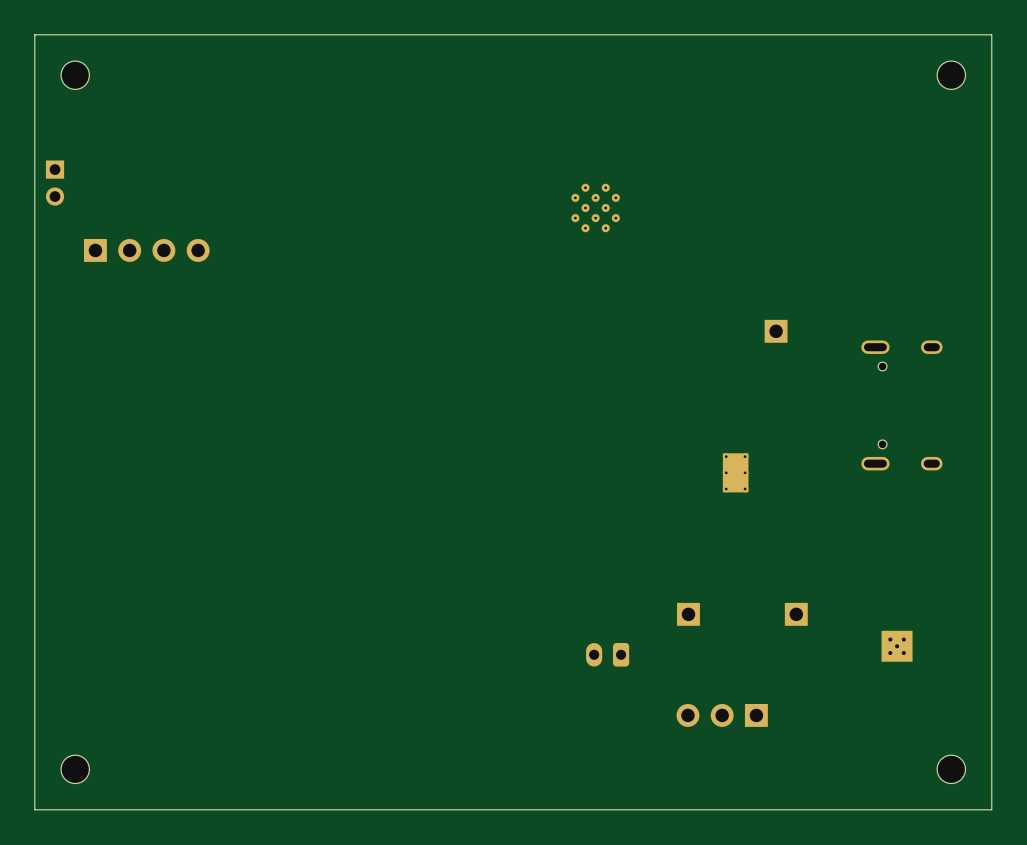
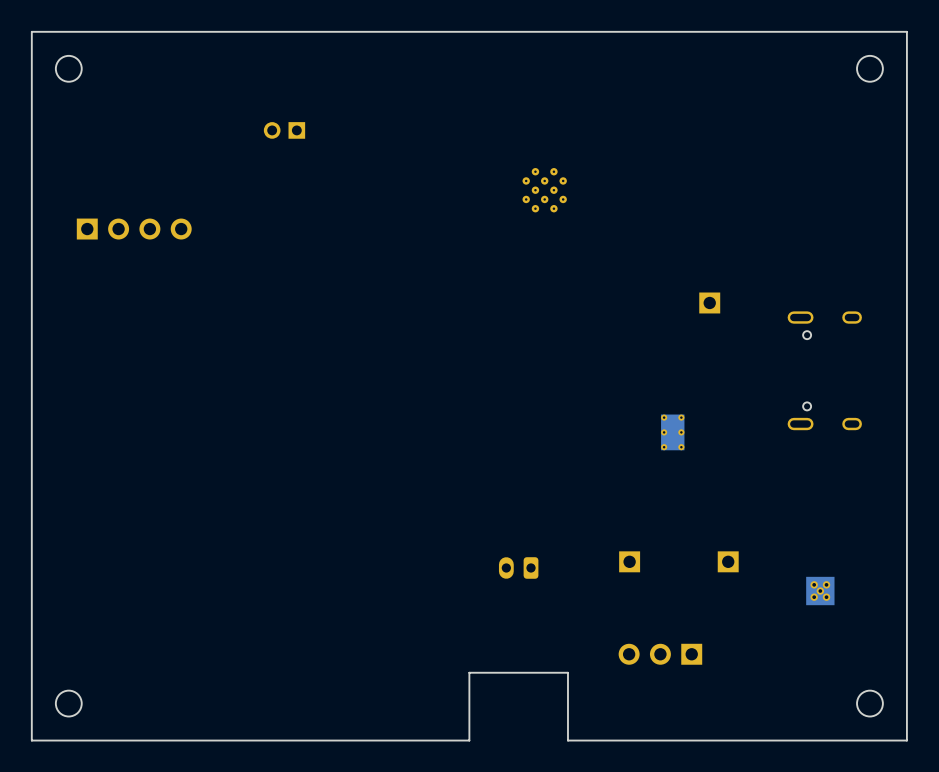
part rotation: 0° (55, 183) -> 90° clockwise (284, 130)
part position: (55, 183) -> (284, 130)
part position: (607, 654) -> (518, 567)
board edge: (621, 809) (513, 809) -> (567, 740) (567, 672) (469, 672) (469, 740)

